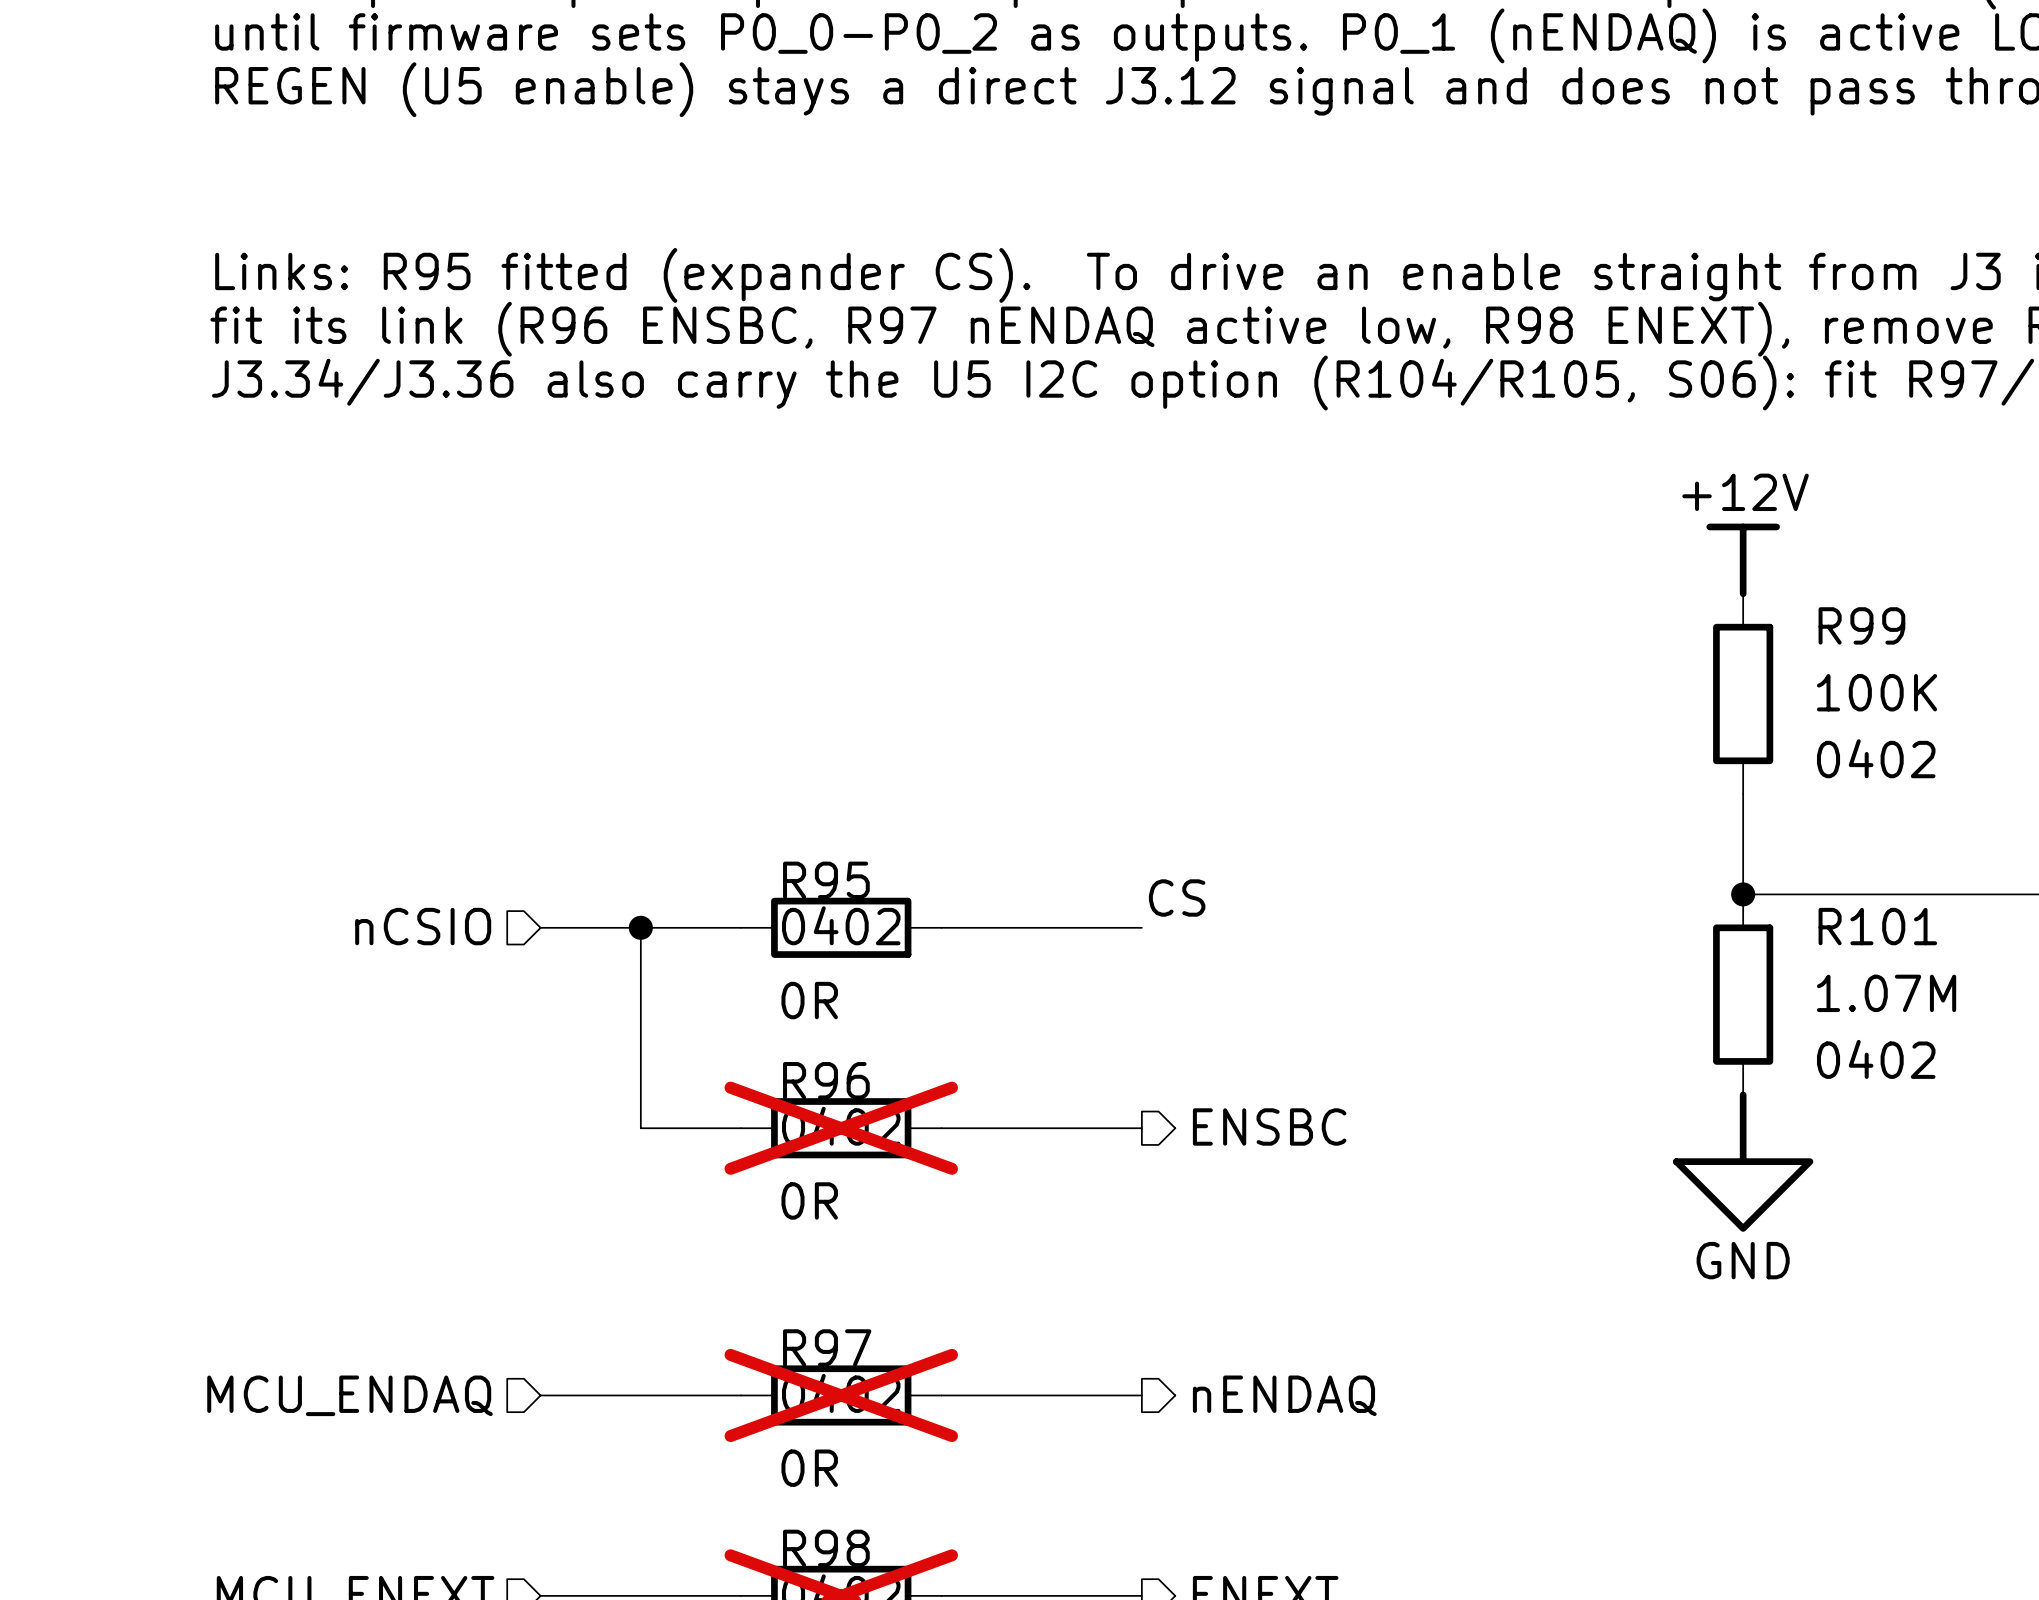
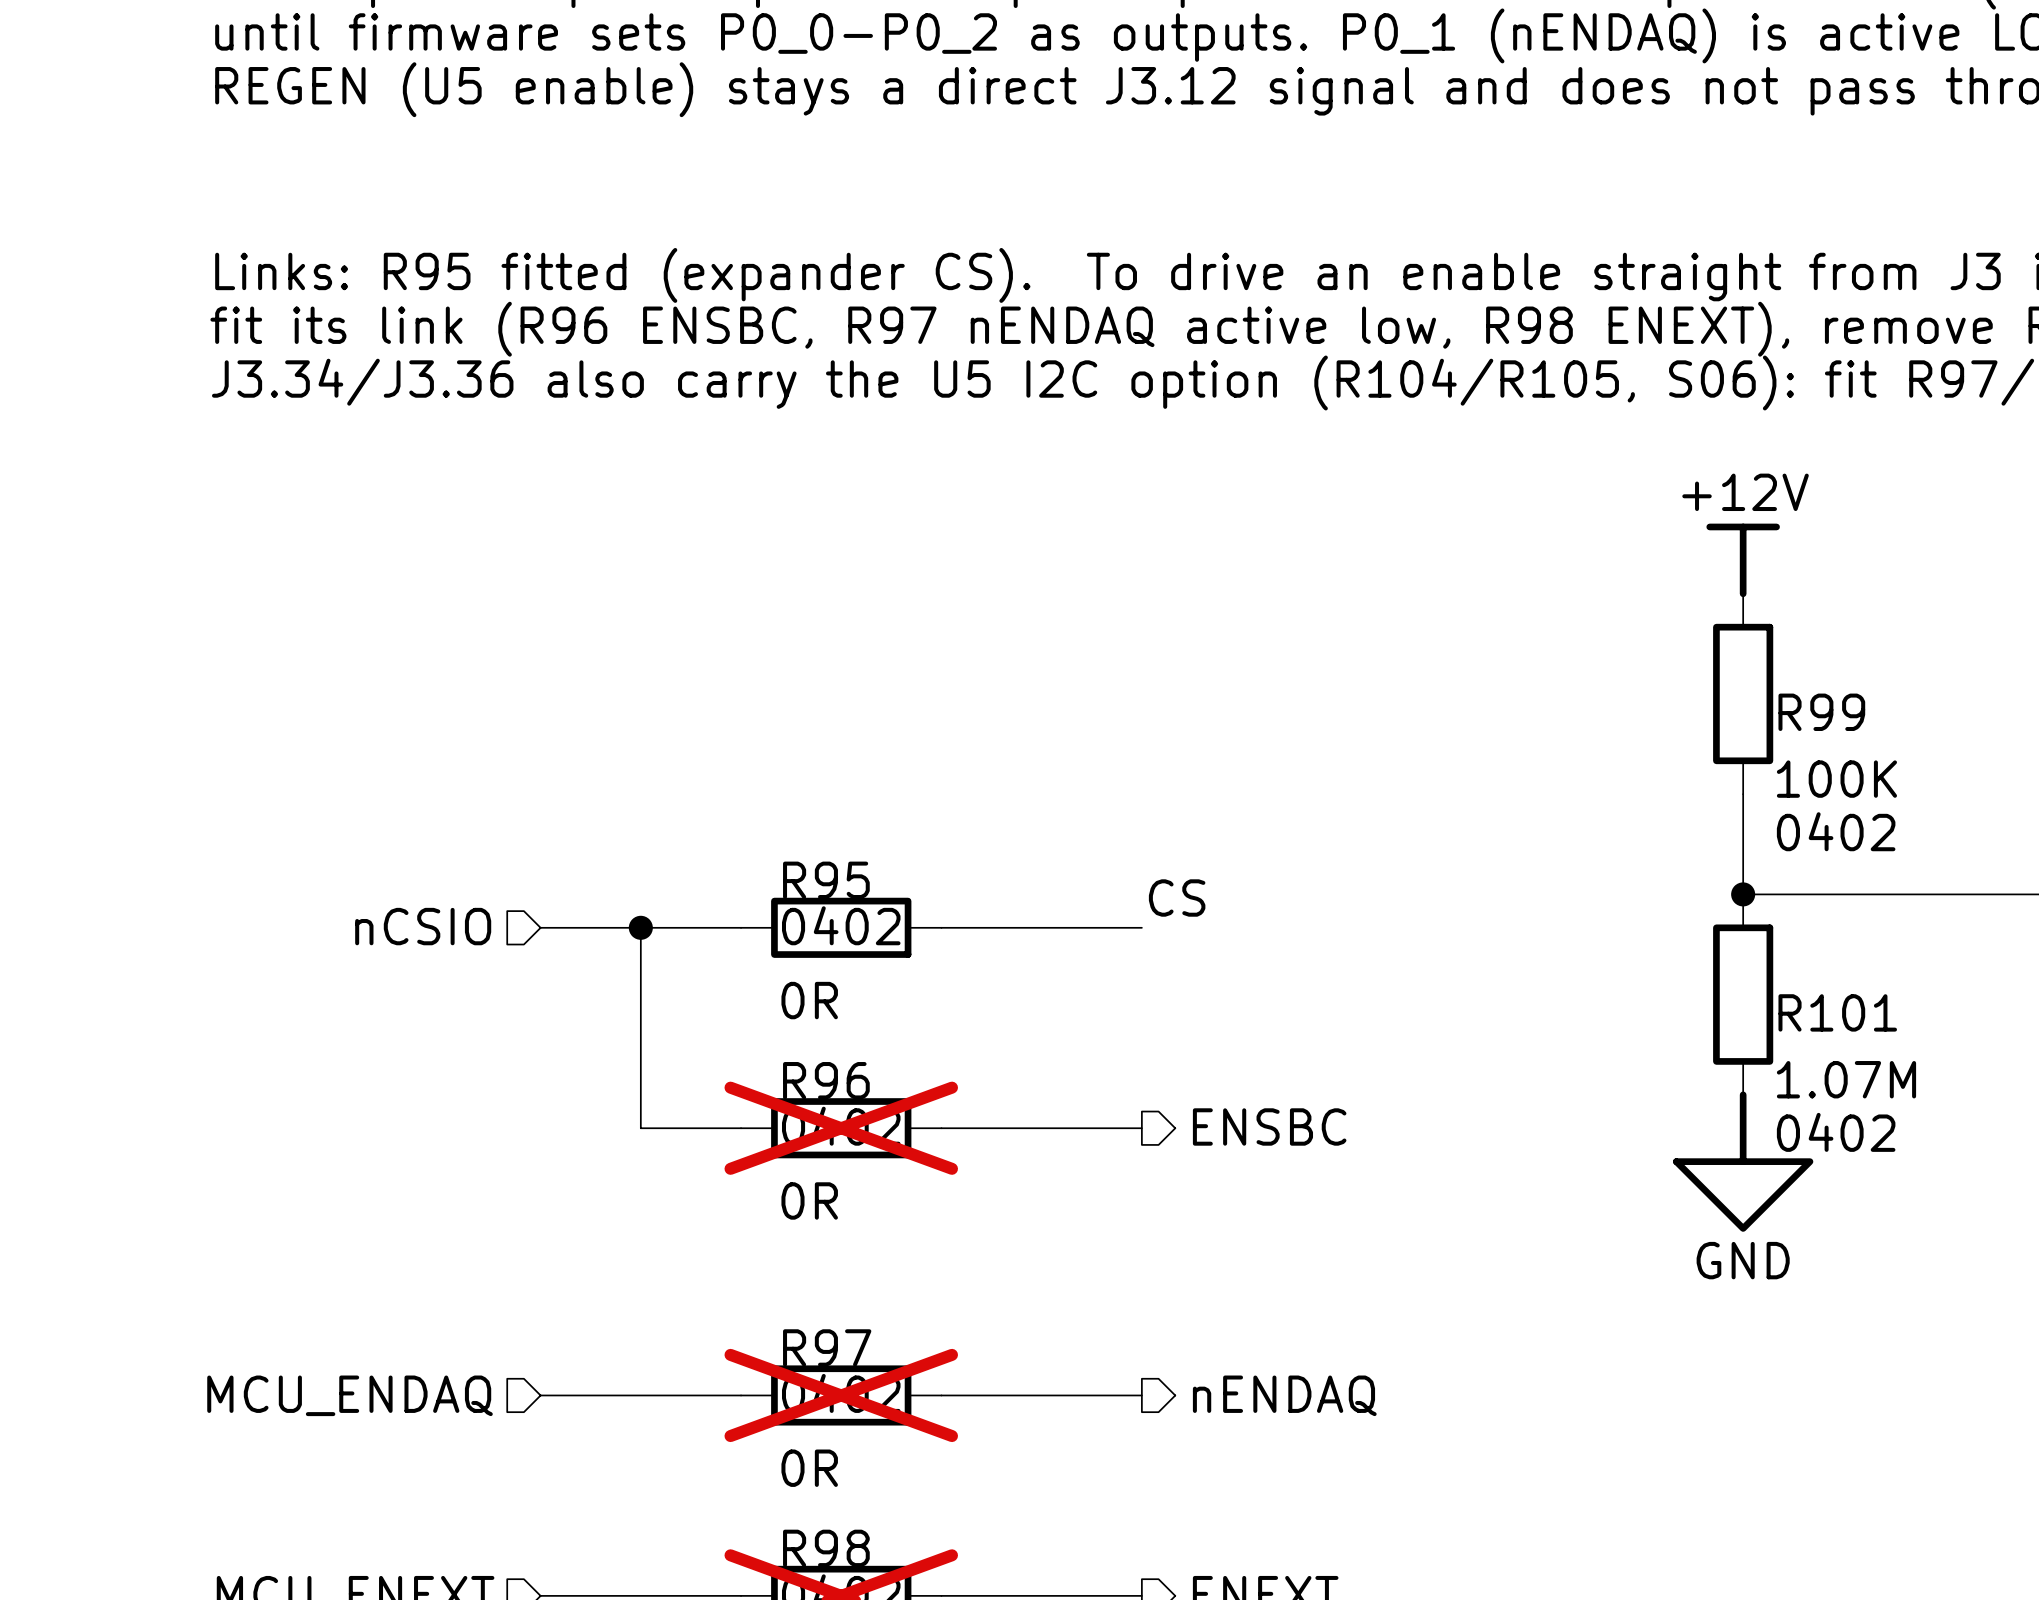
R99 name position: R99 (1861, 625) -> R99 (1821, 712)
R99 value position: 100K (1877, 692) -> 100K (1836, 779)
R99 text position: 0402 (1876, 758) -> 0402 (1836, 831)
R101 name position: R101 (1877, 926) -> R101 (1837, 1012)
R101 value position: 1.07M (1886, 993) -> 1.07M (1846, 1079)
R101 text position: 0402 (1876, 1059) -> 0402 (1836, 1132)

